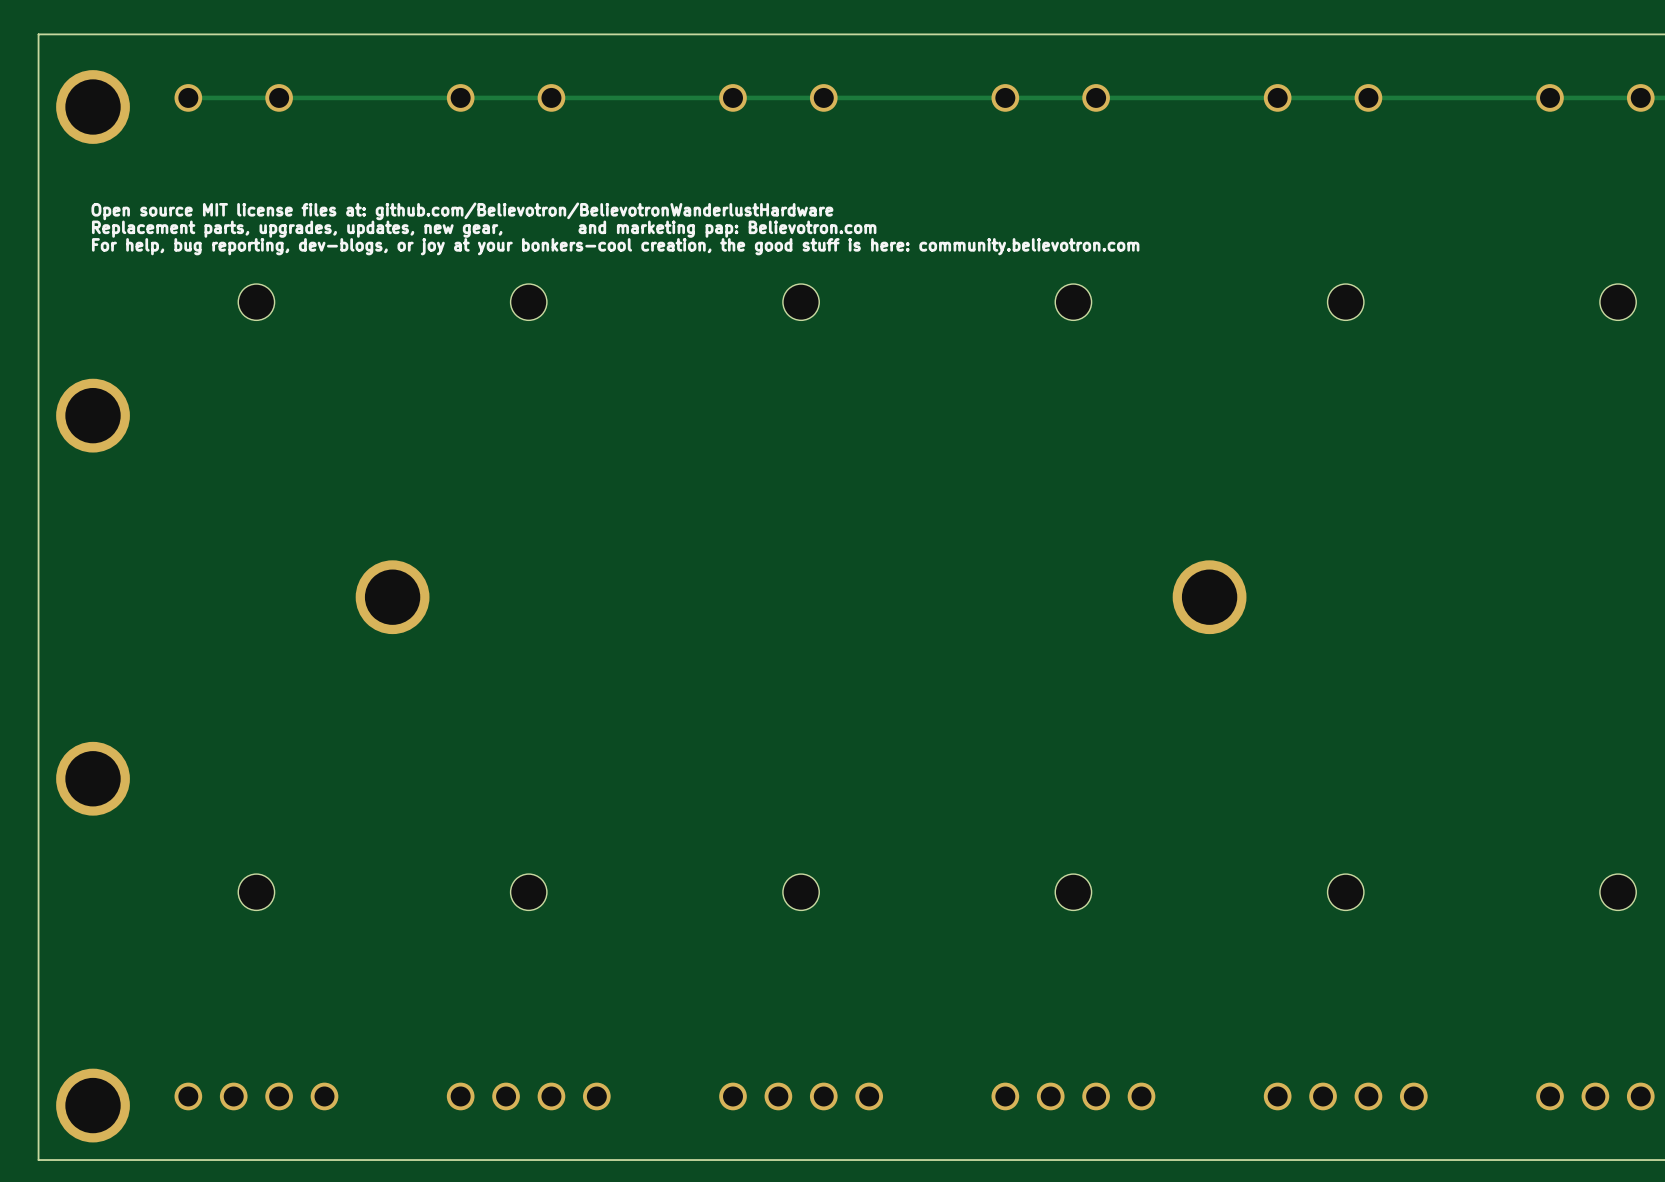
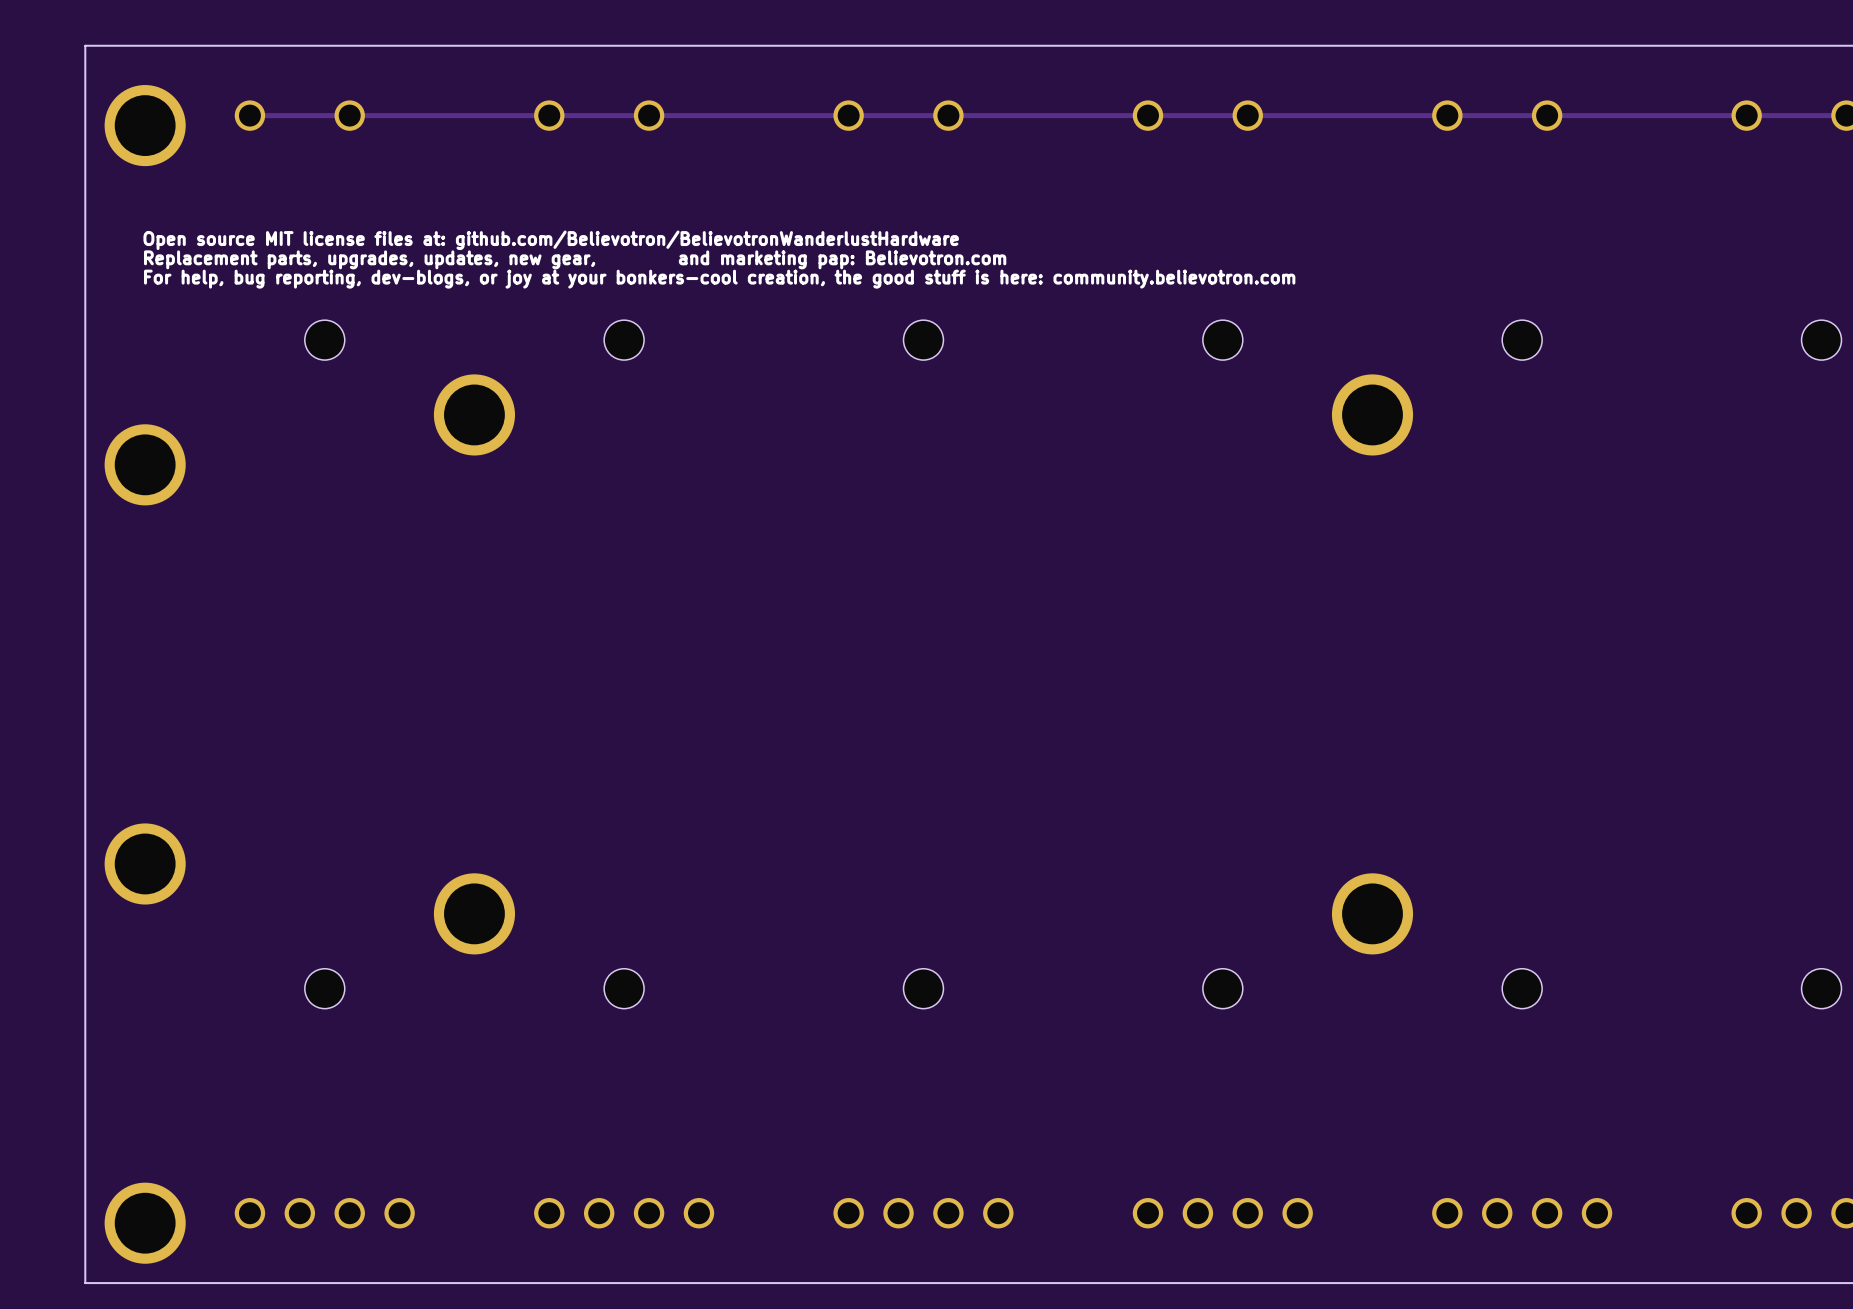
part: none -> (474, 414)
part: none -> (1372, 414)
part: (392, 597) -> none
part: (1209, 597) -> none
part: none -> (474, 913)
part: none -> (1372, 913)

